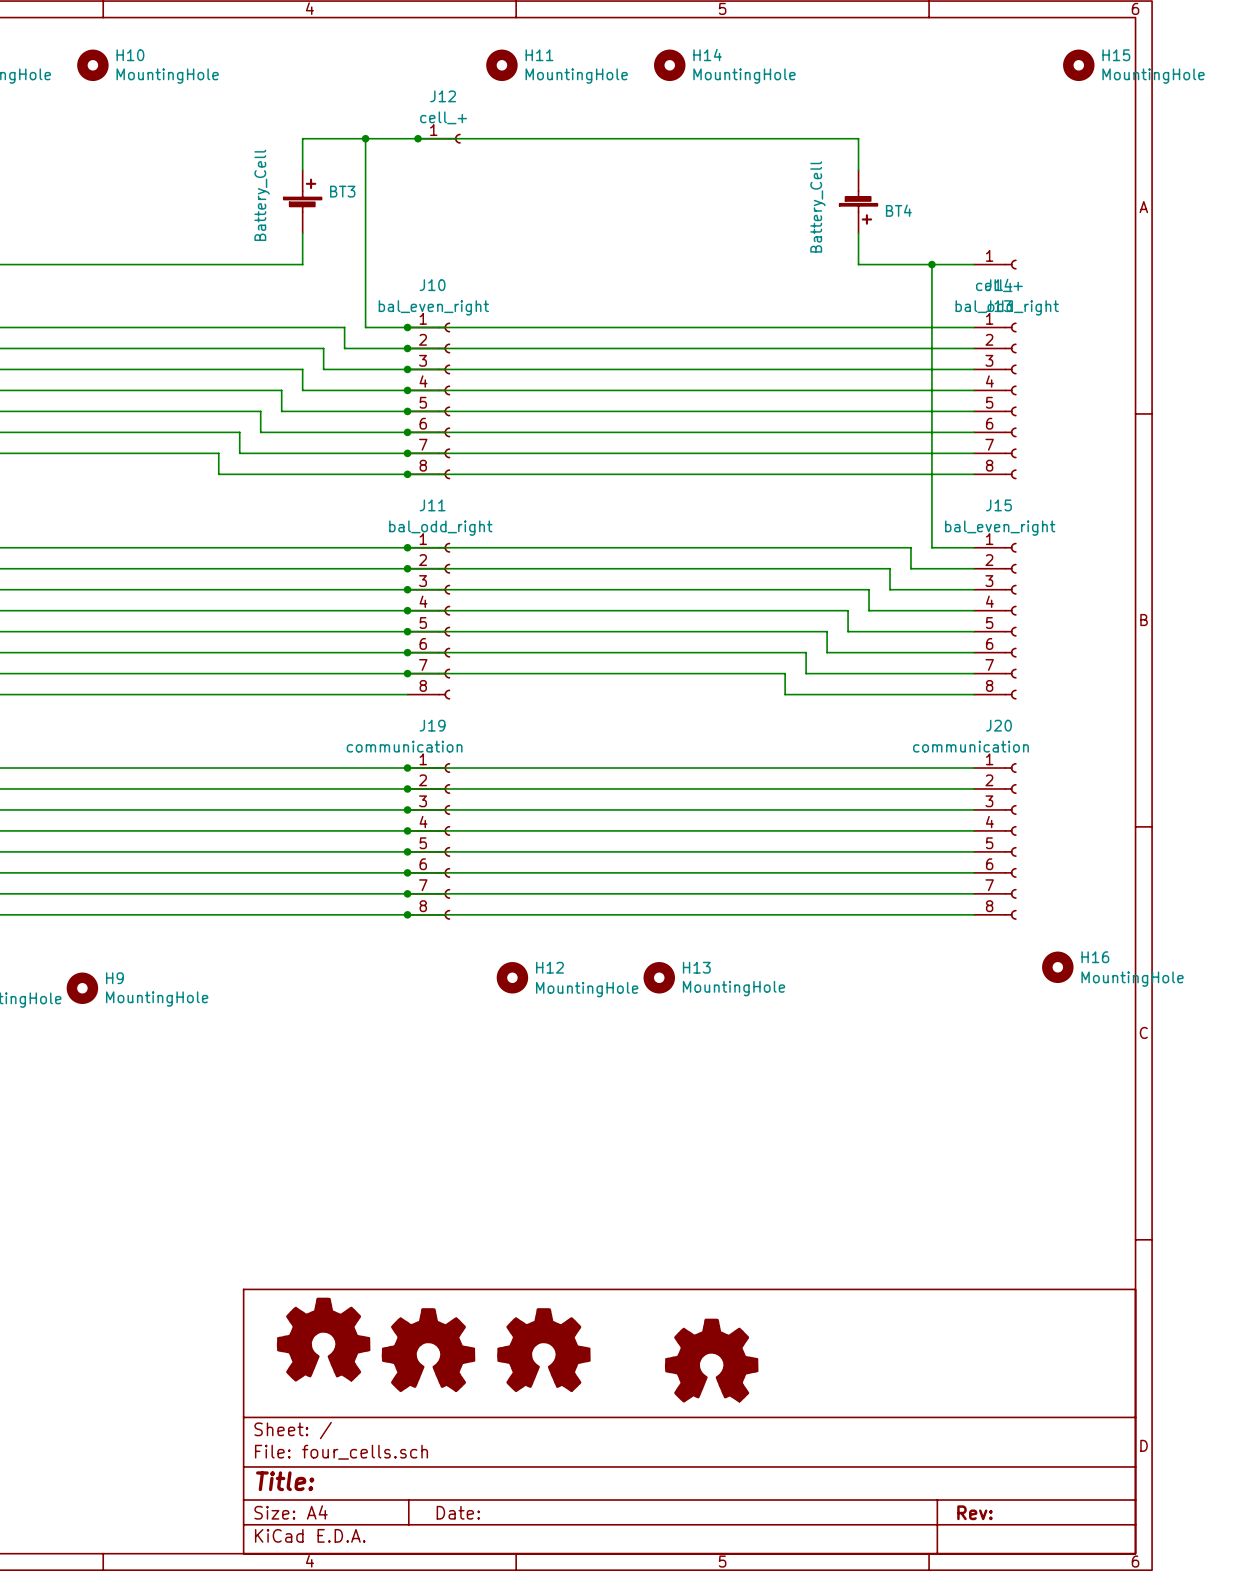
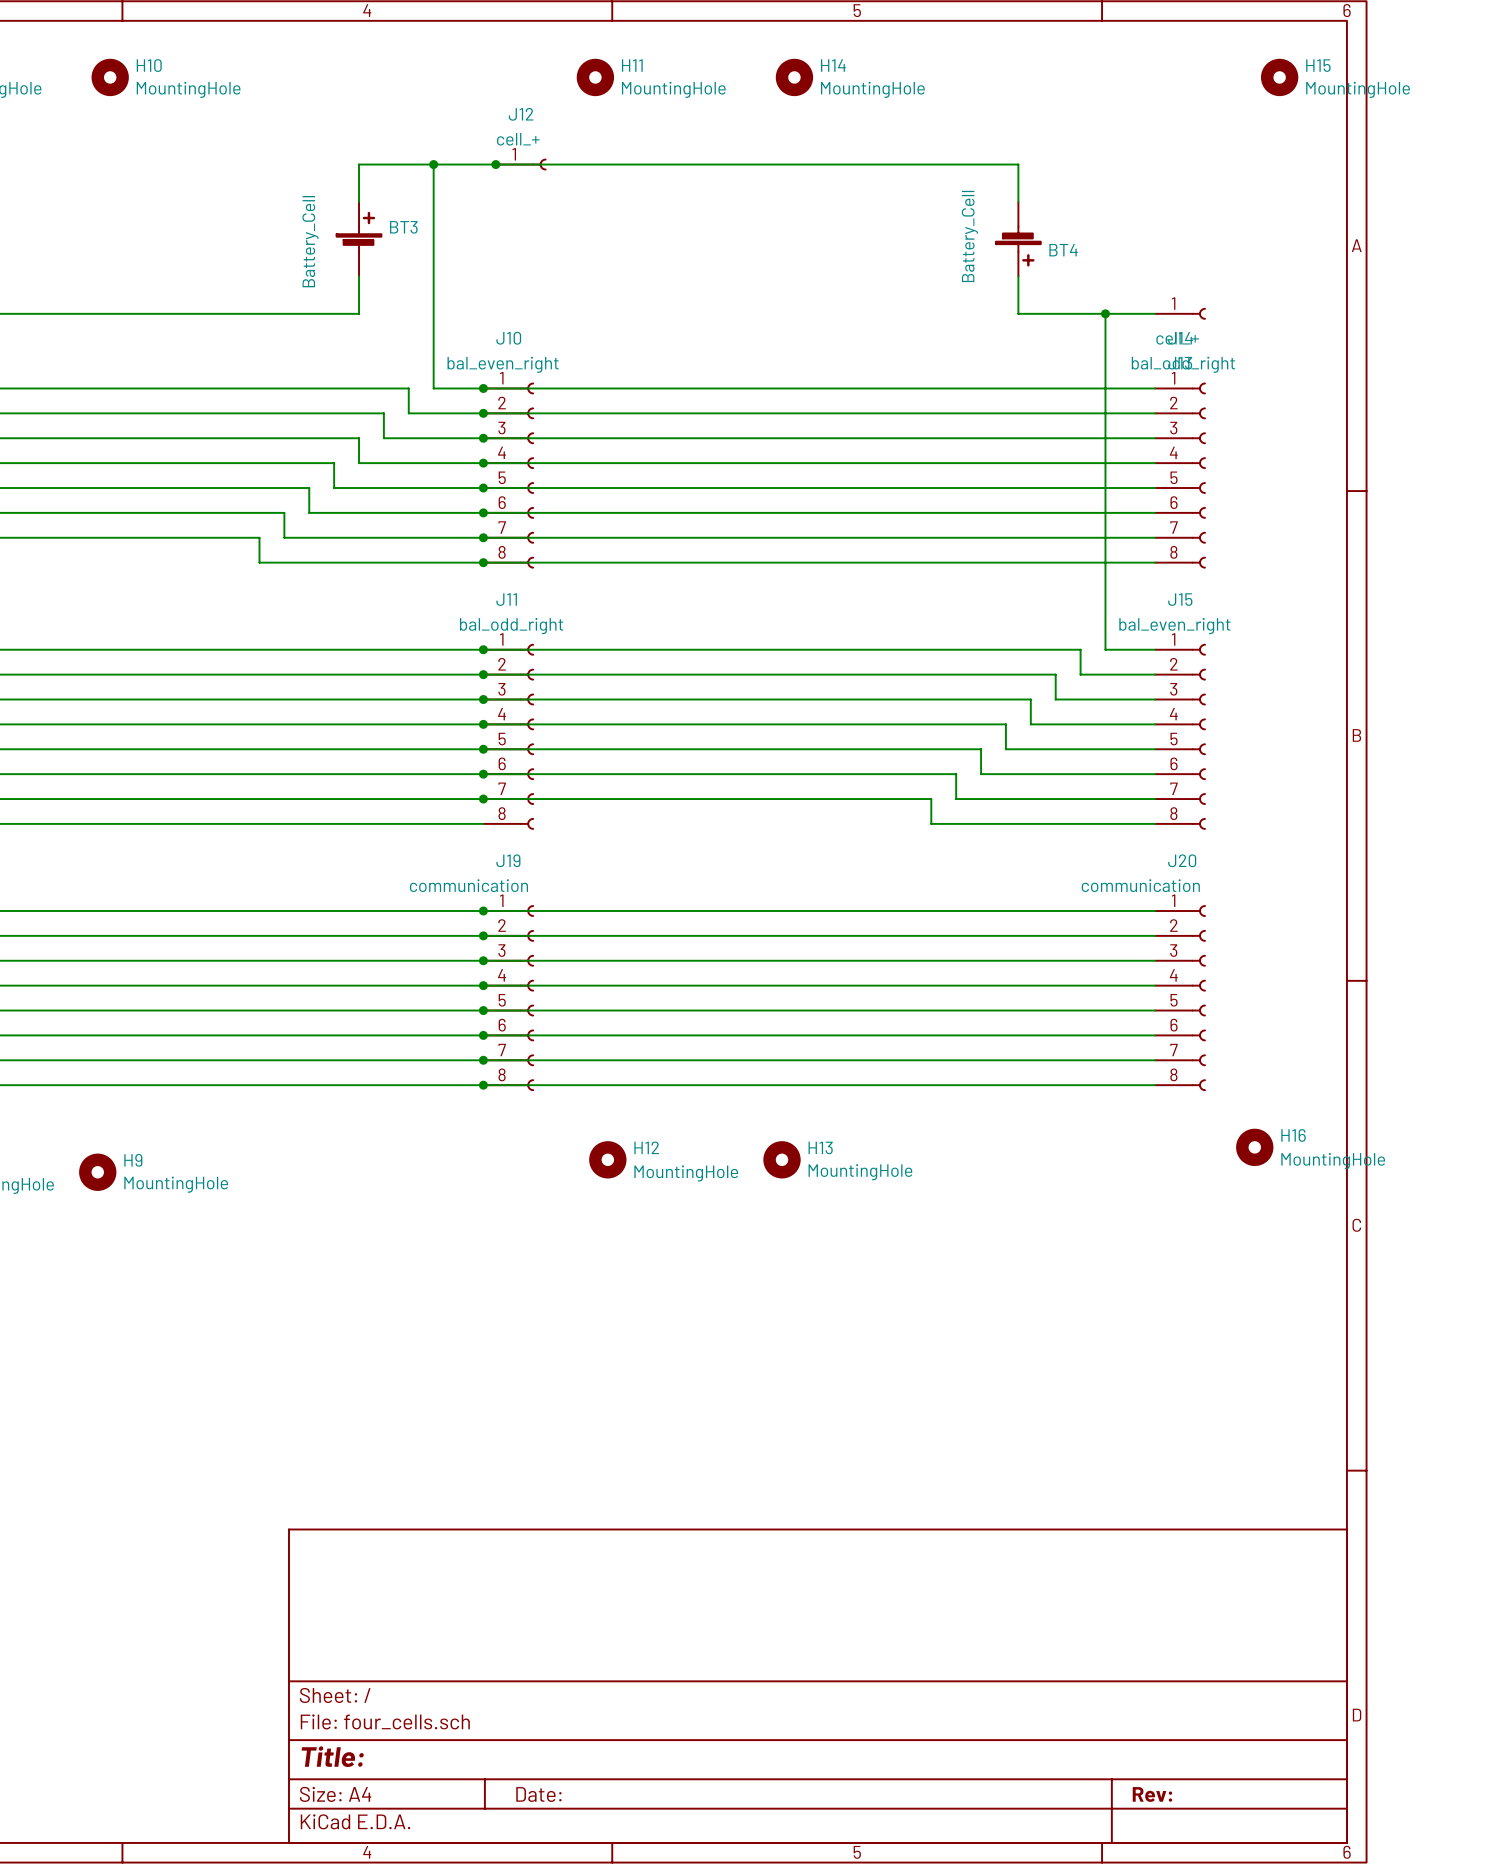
part: (323, 1339) -> none
part: (428, 1350) -> none
part: (543, 1350) -> none
part: (711, 1360) -> none

